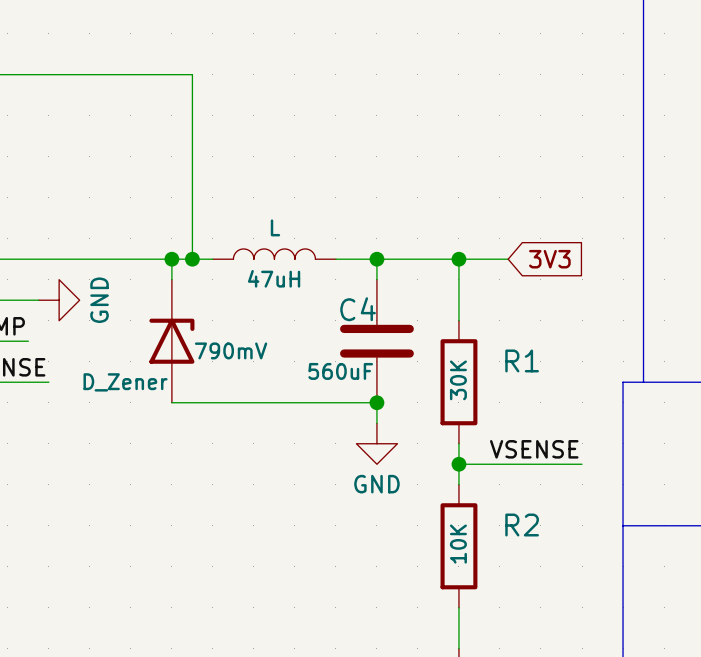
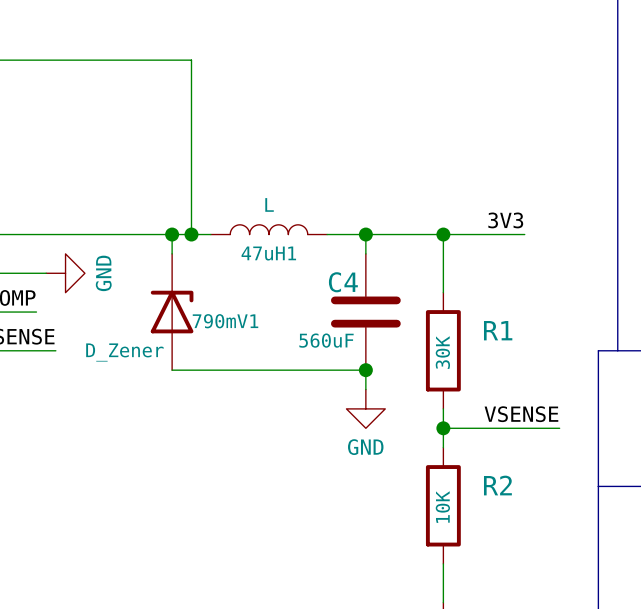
label: none -> 3V3 (505, 220)
wire: none -> (489, 234) (524, 234)
global label: 3V3 (549, 259) -> none
47uH name: 47uH (274, 278) -> 47uH1 (268, 253)
790mV name: 790mV (231, 350) -> 790mV1 (225, 321)

